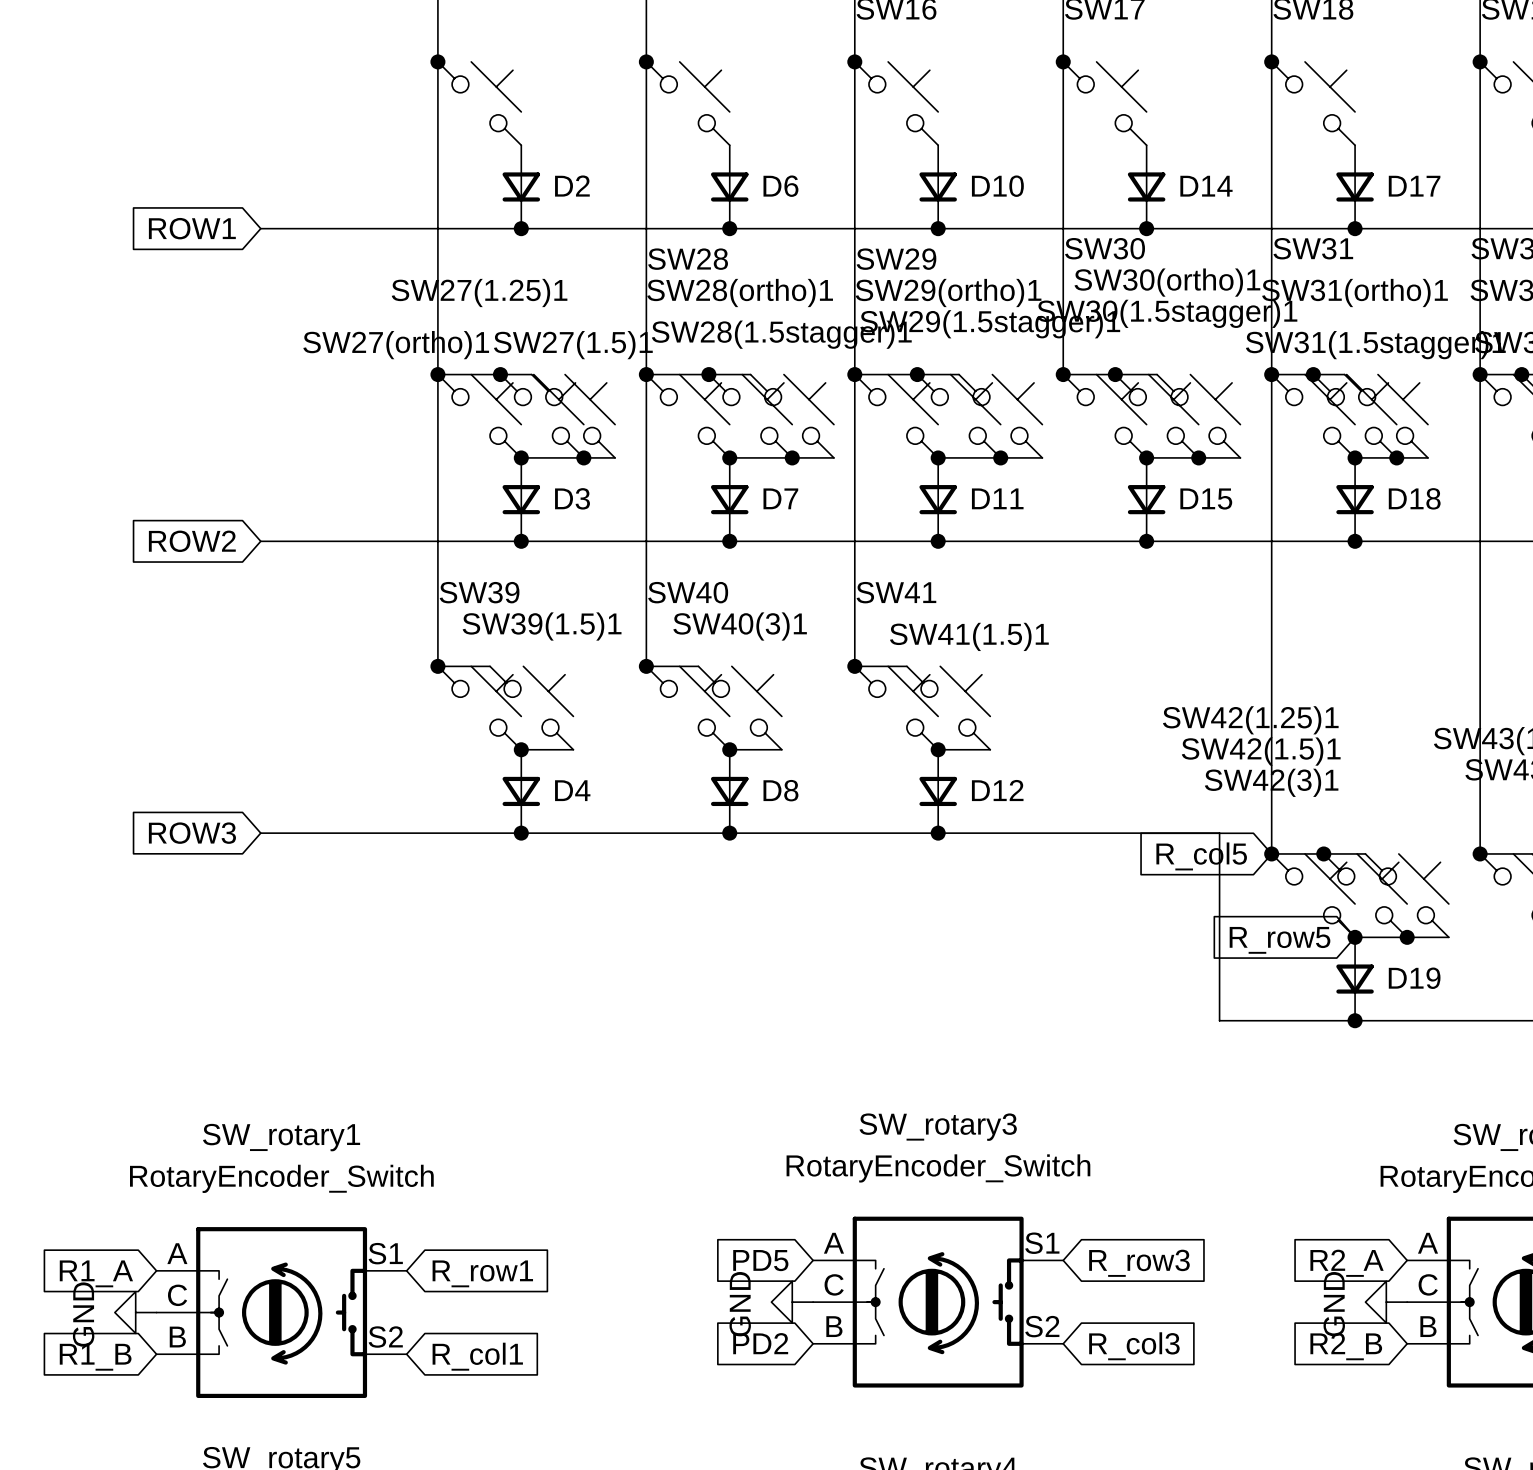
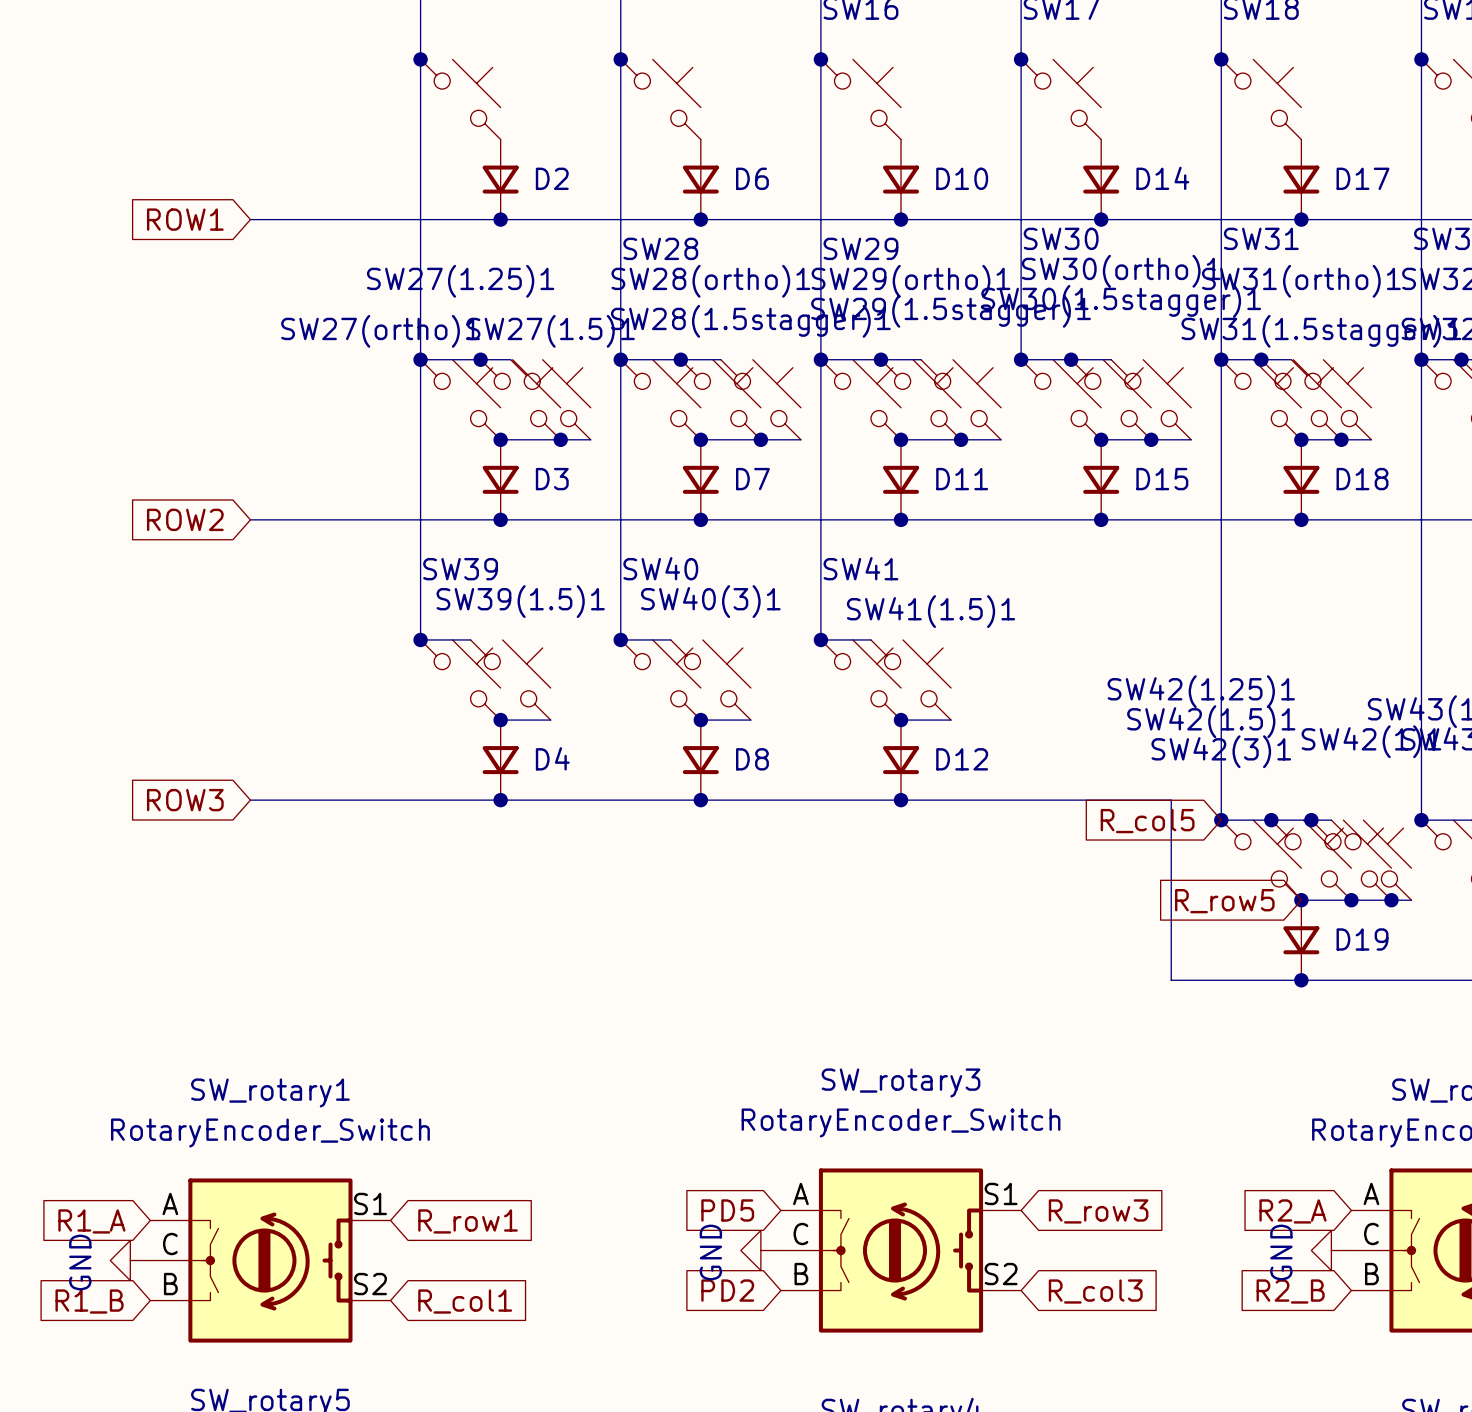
wire: none -> (1311, 820) (1331, 820)
junction: none -> (1311, 820)
SW42(1)1: none -> (1371, 860)
wire: none -> (1391, 900) (1411, 900)
junction: none -> (1391, 900)

